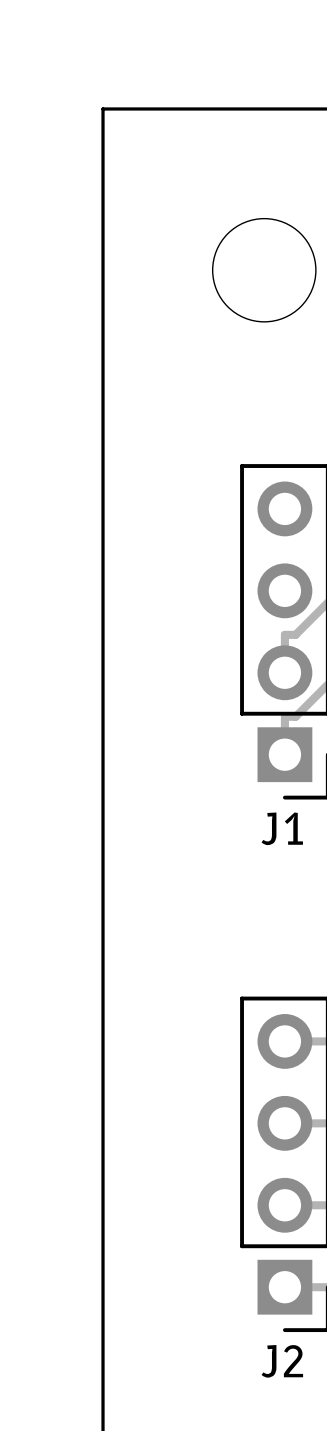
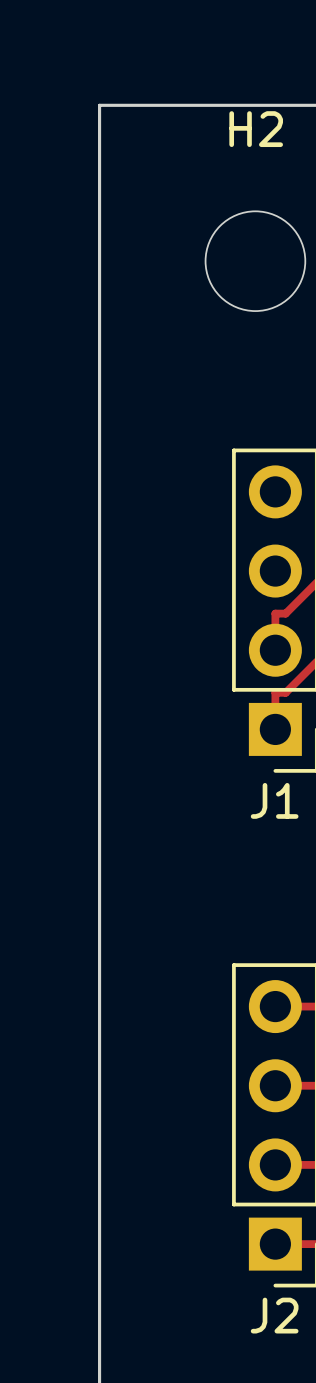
H2 name: none -> H2 (256, 129)

